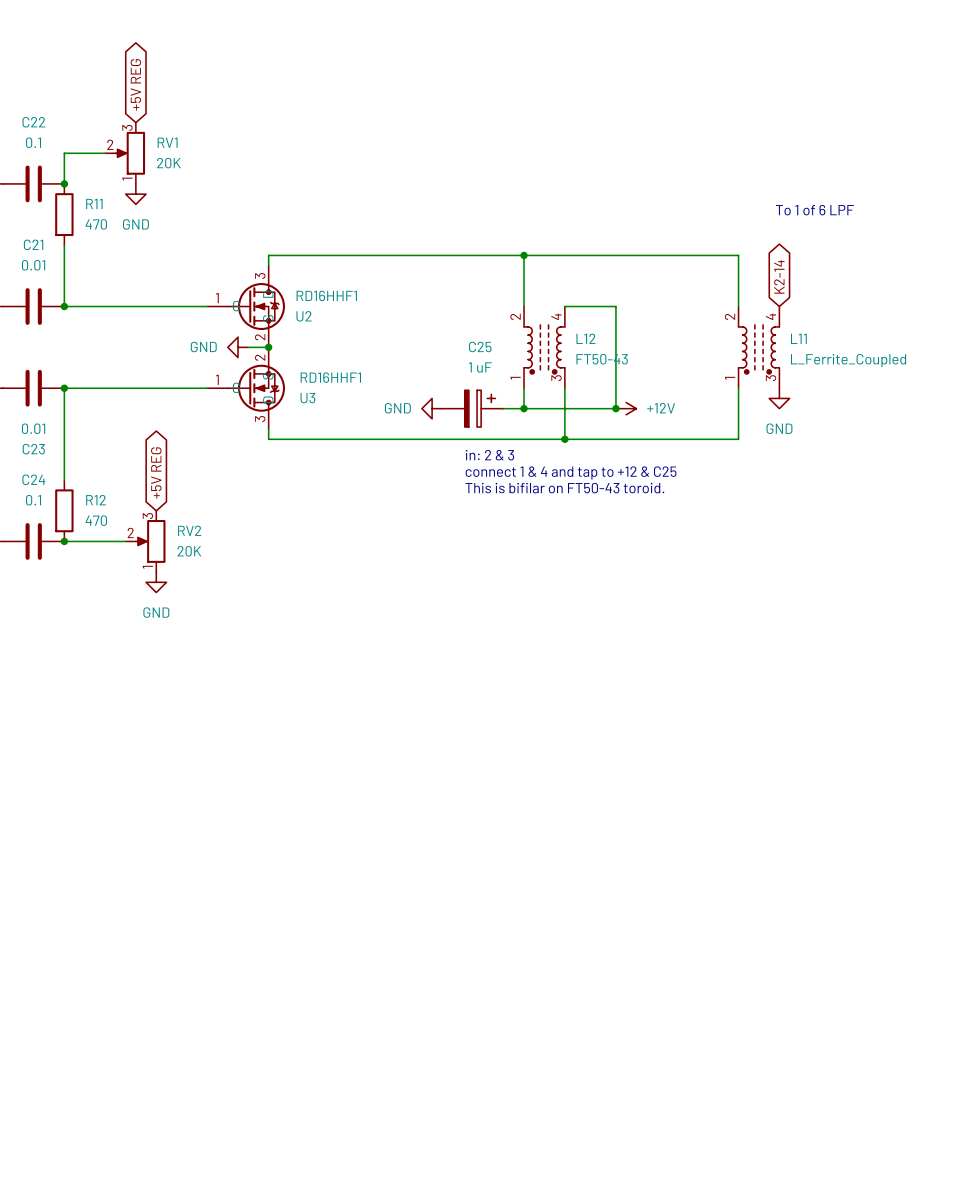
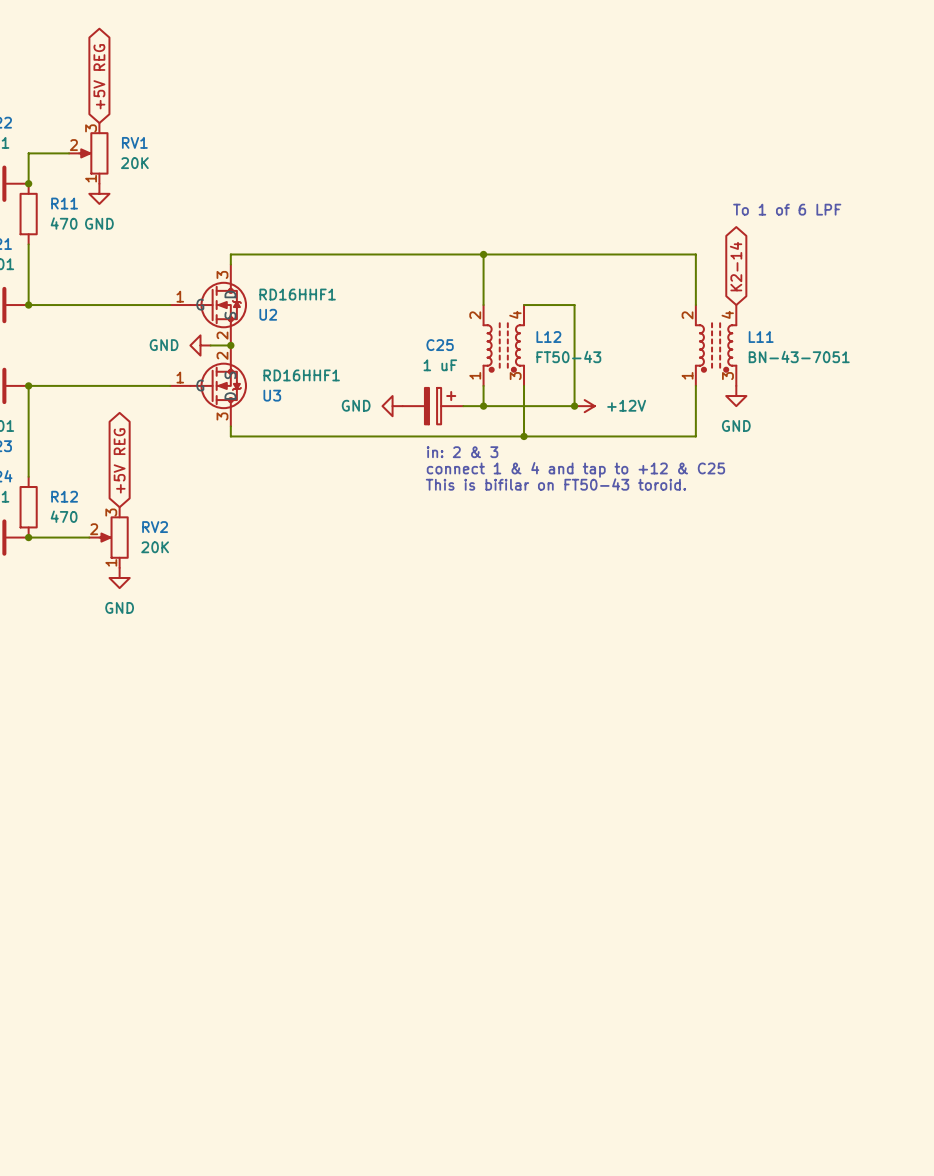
L11 value: L_Ferrite_Coupled (848, 360) -> BN-43-7051 (799, 356)

